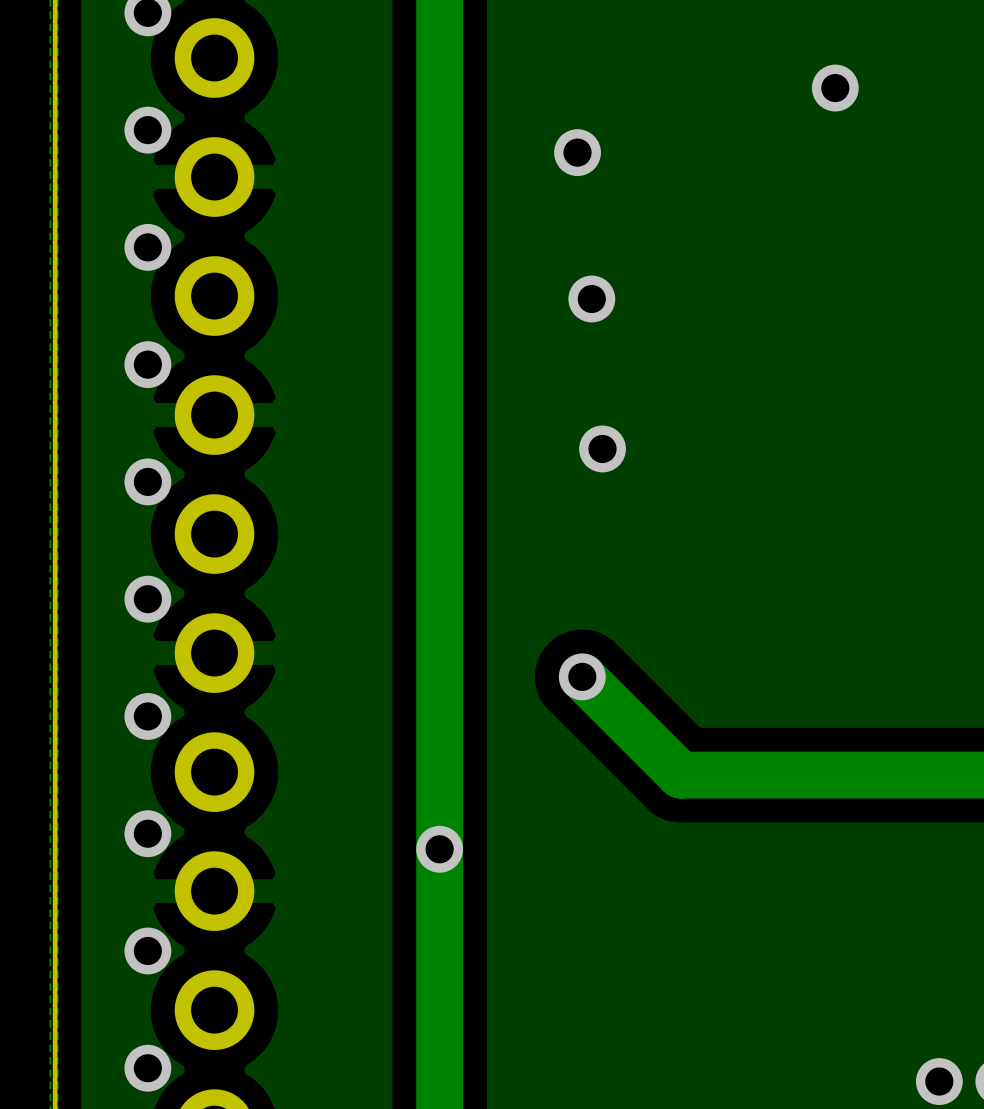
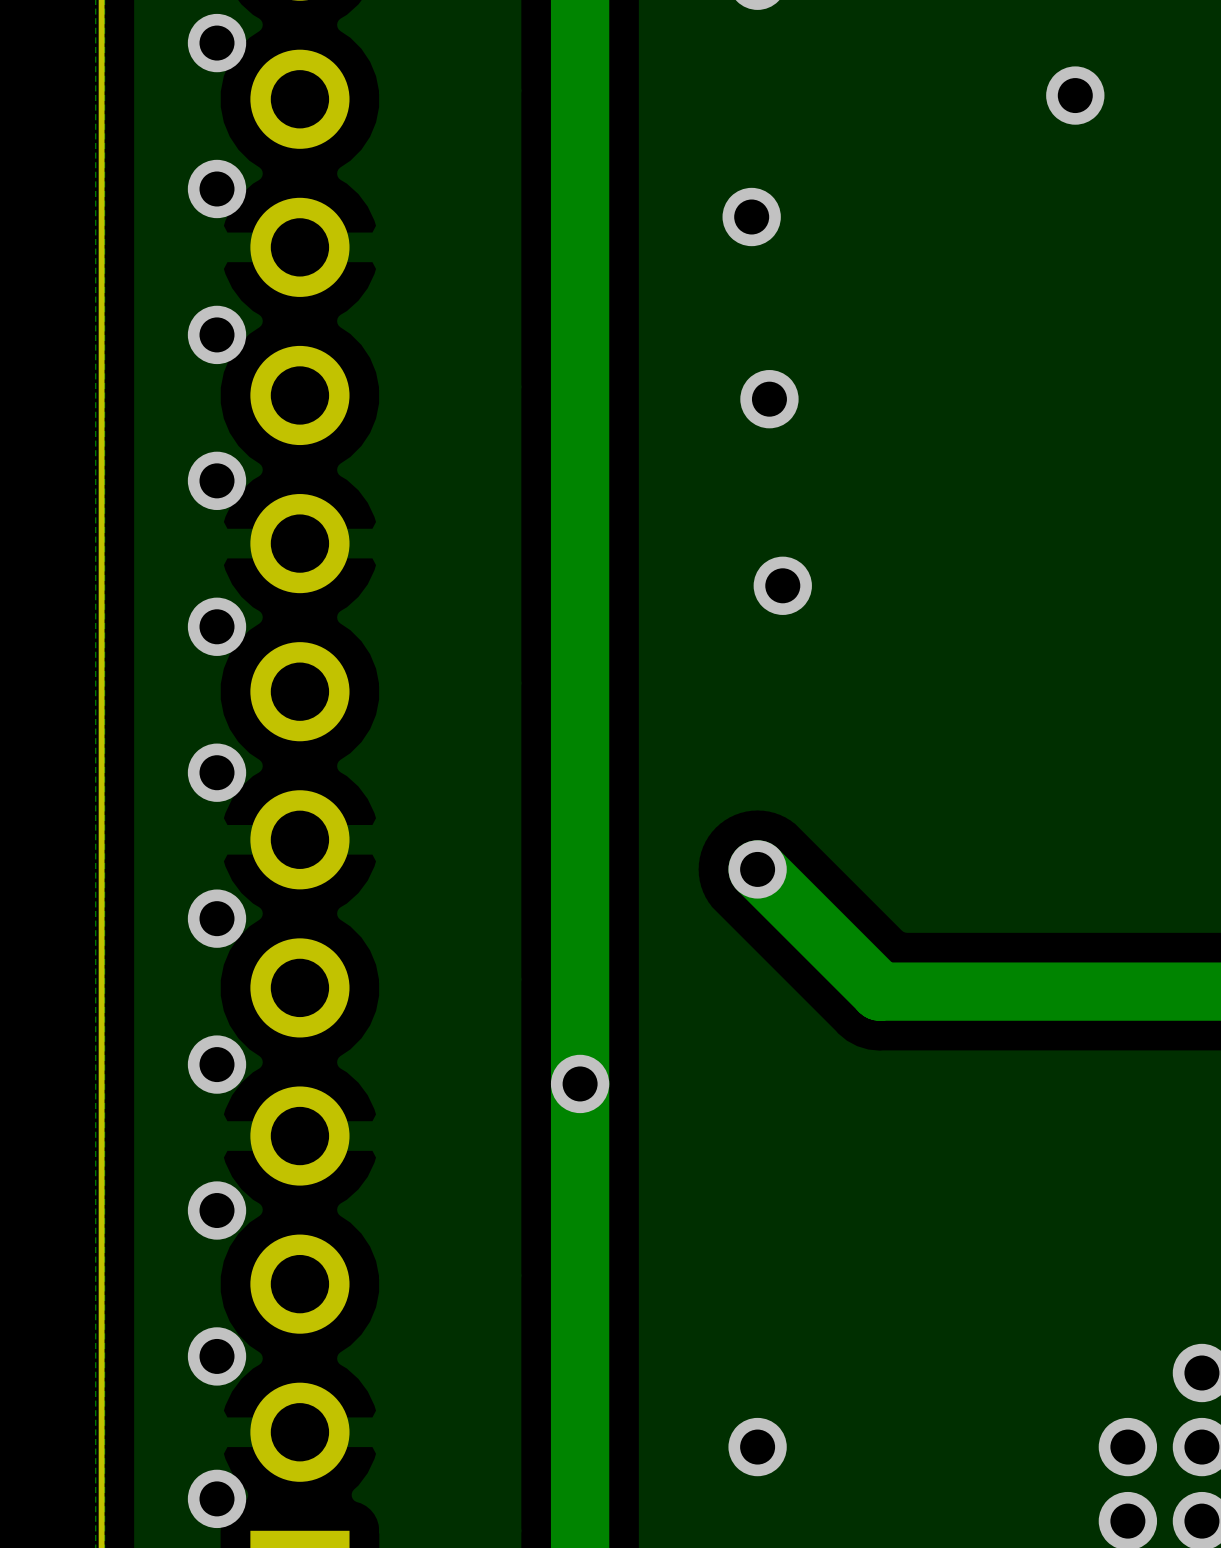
via position: (835, 88) -> (1075, 95)

